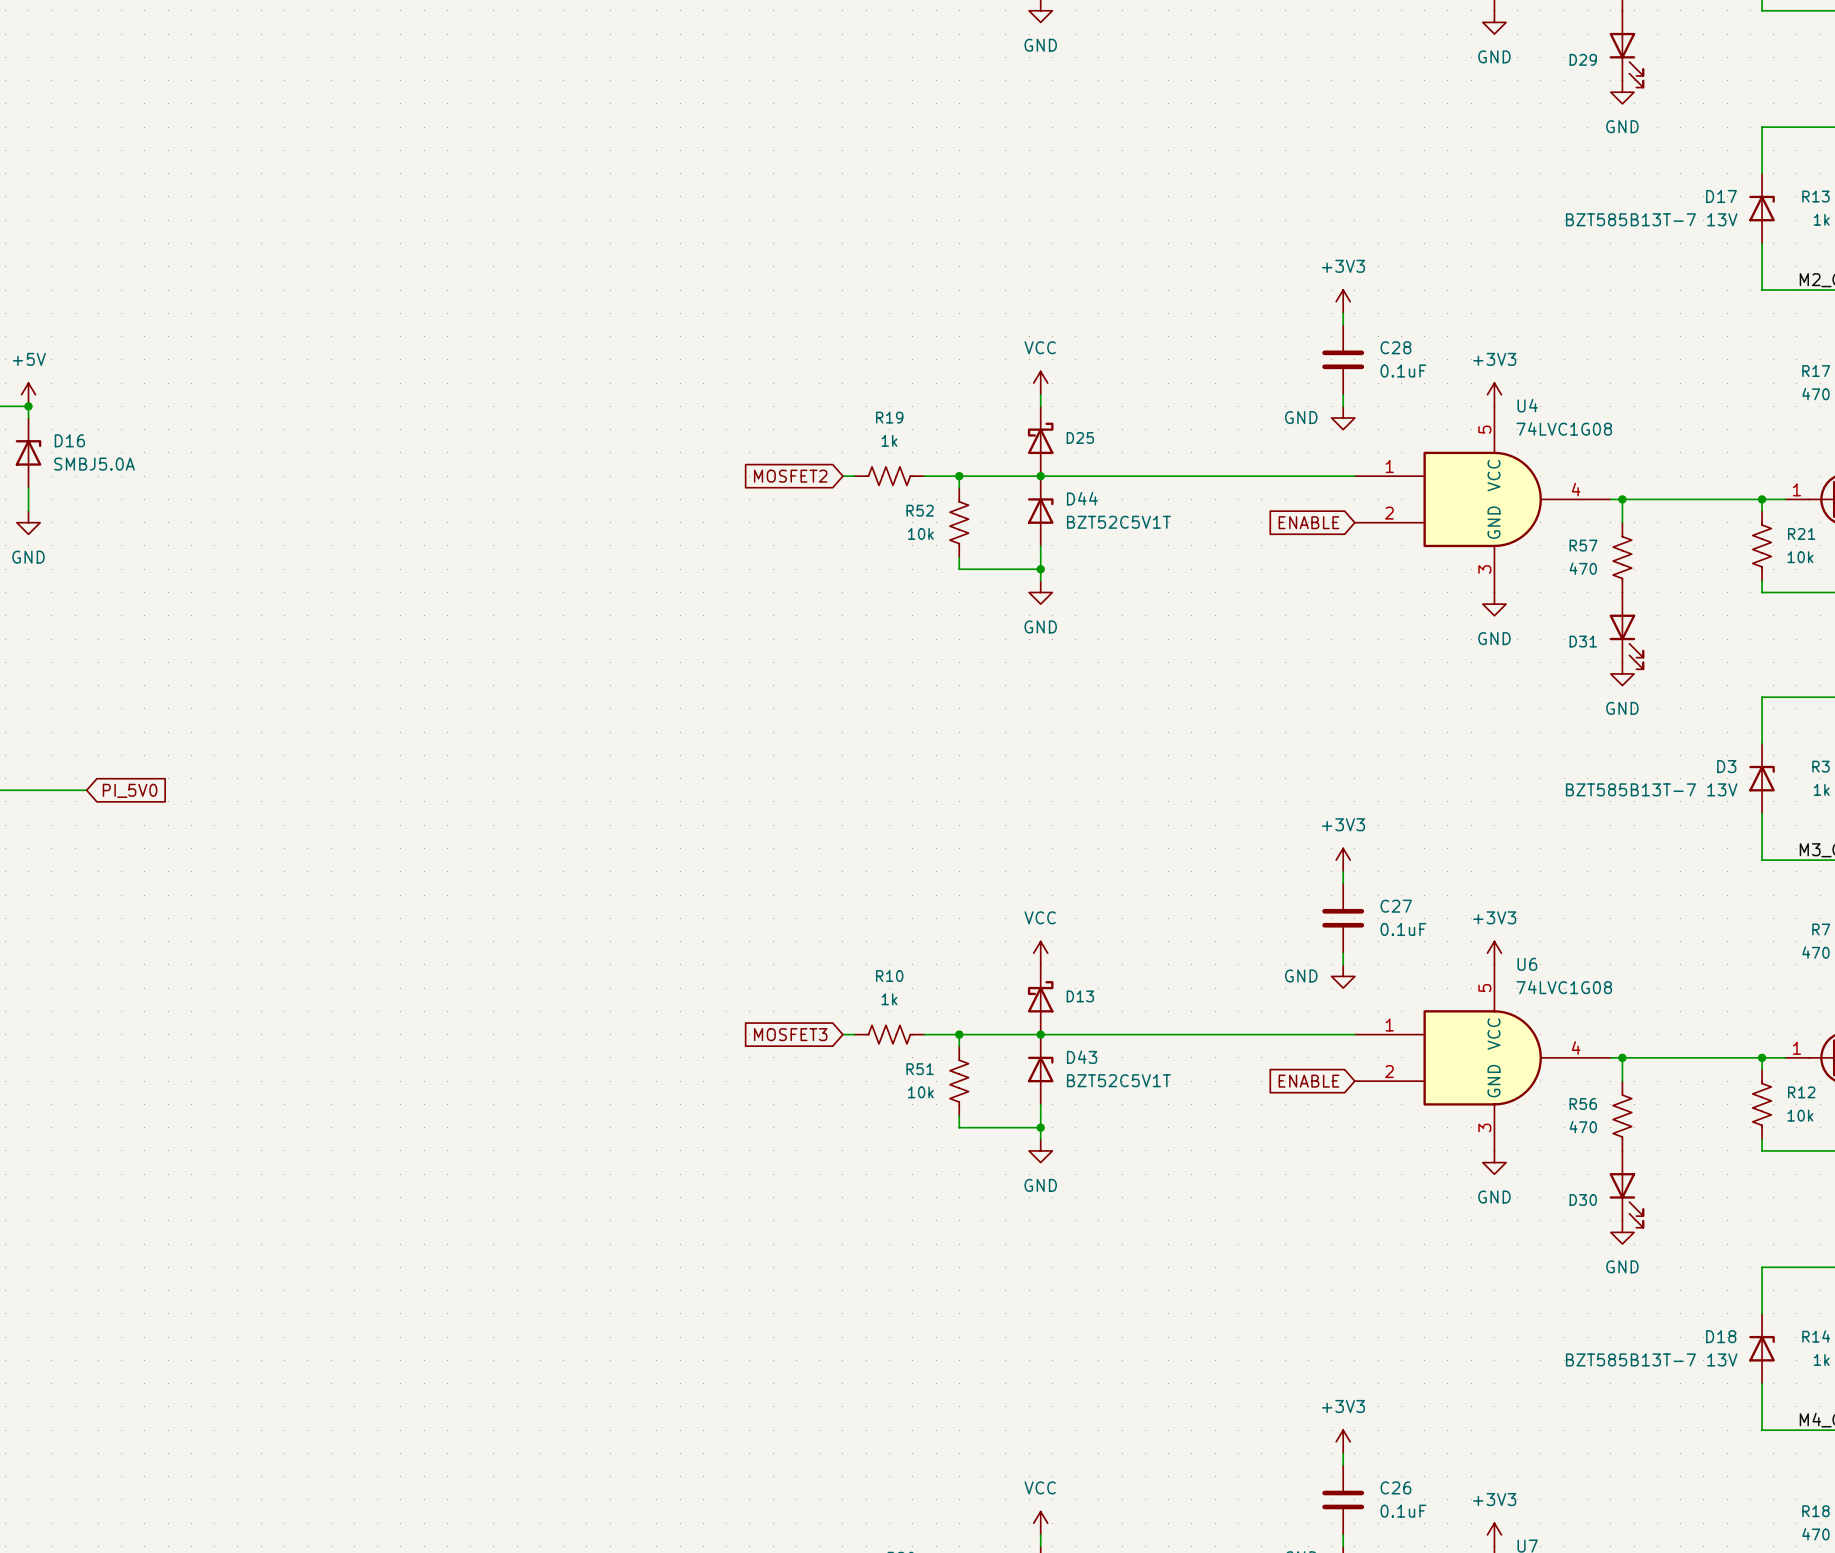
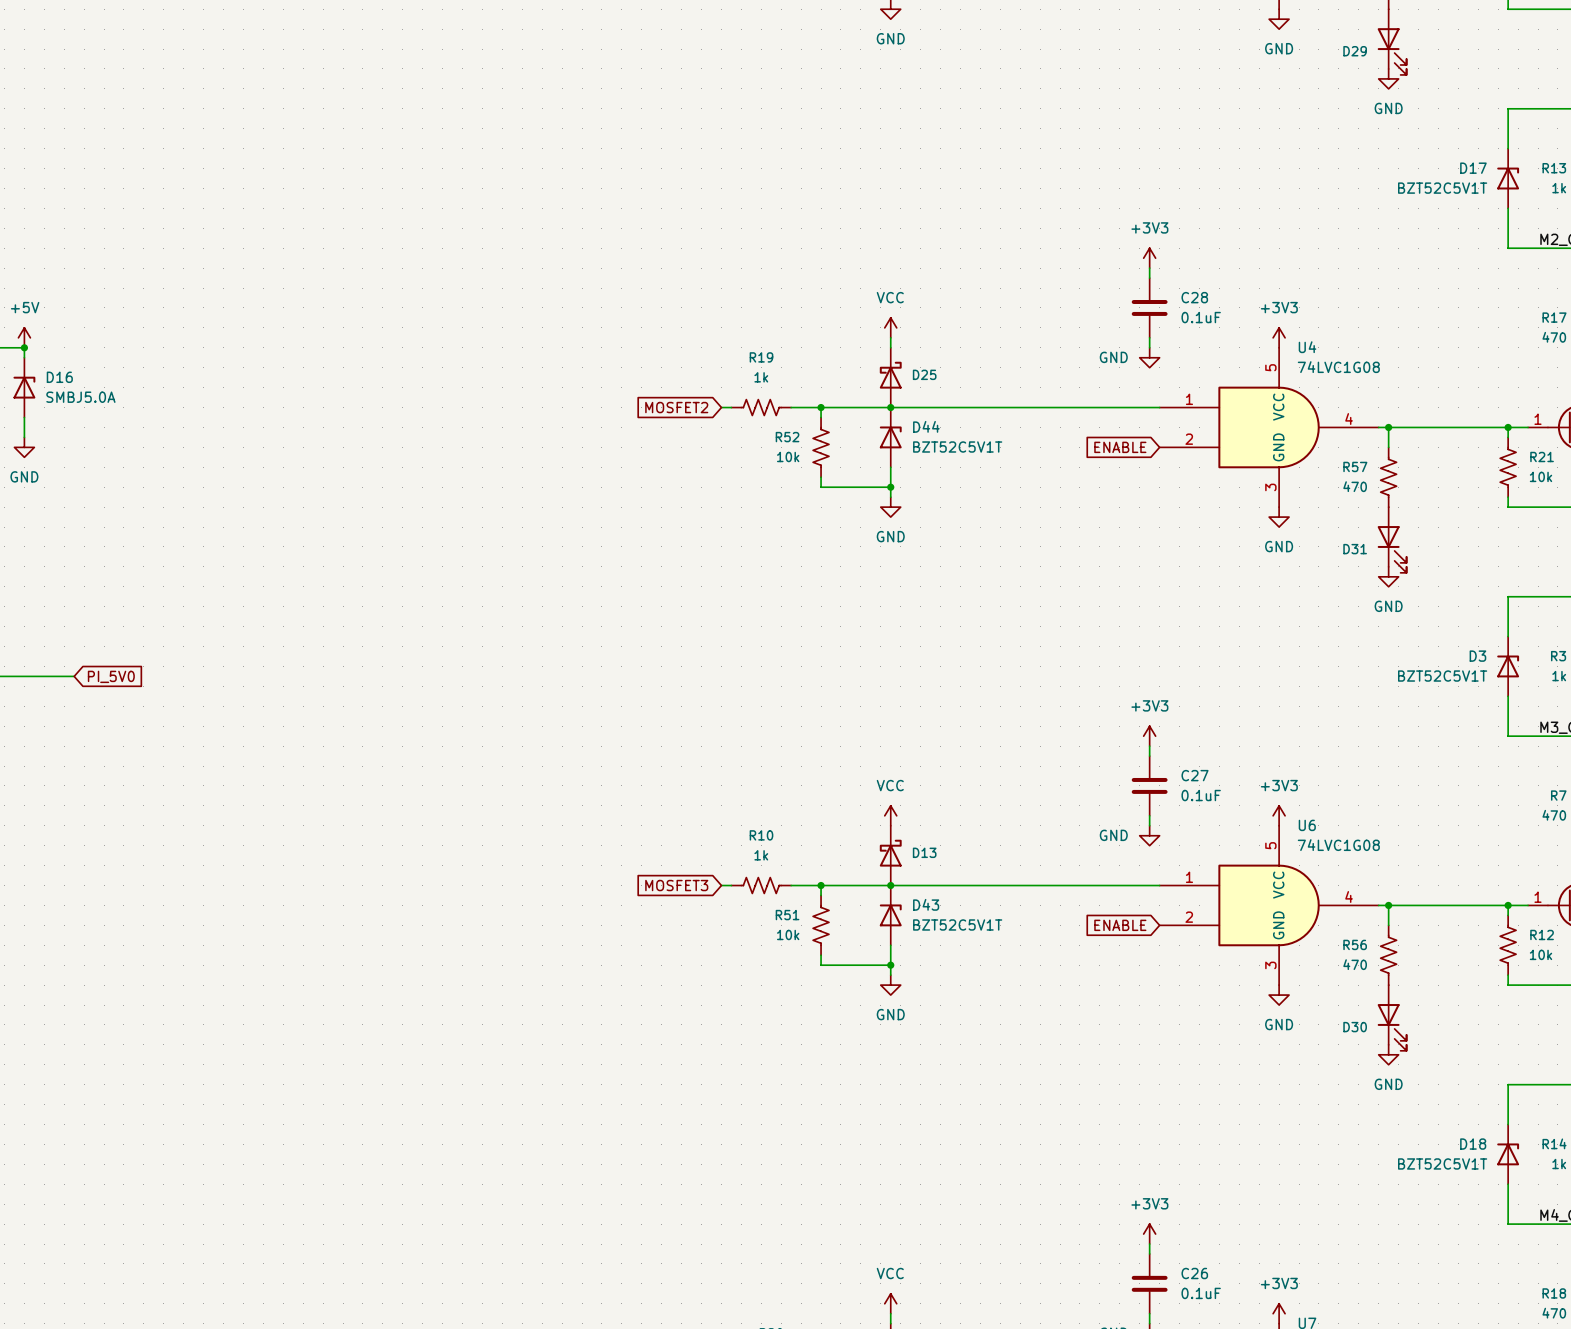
D17 value: BZT585B13T-7 13V (1651, 219) -> BZT52C5V1T (1442, 188)
D3 value: BZT585B13T-7 13V (1651, 789) -> BZT52C5V1T (1442, 676)
D18 value: BZT585B13T-7 13V (1651, 1359) -> BZT52C5V1T (1442, 1163)

